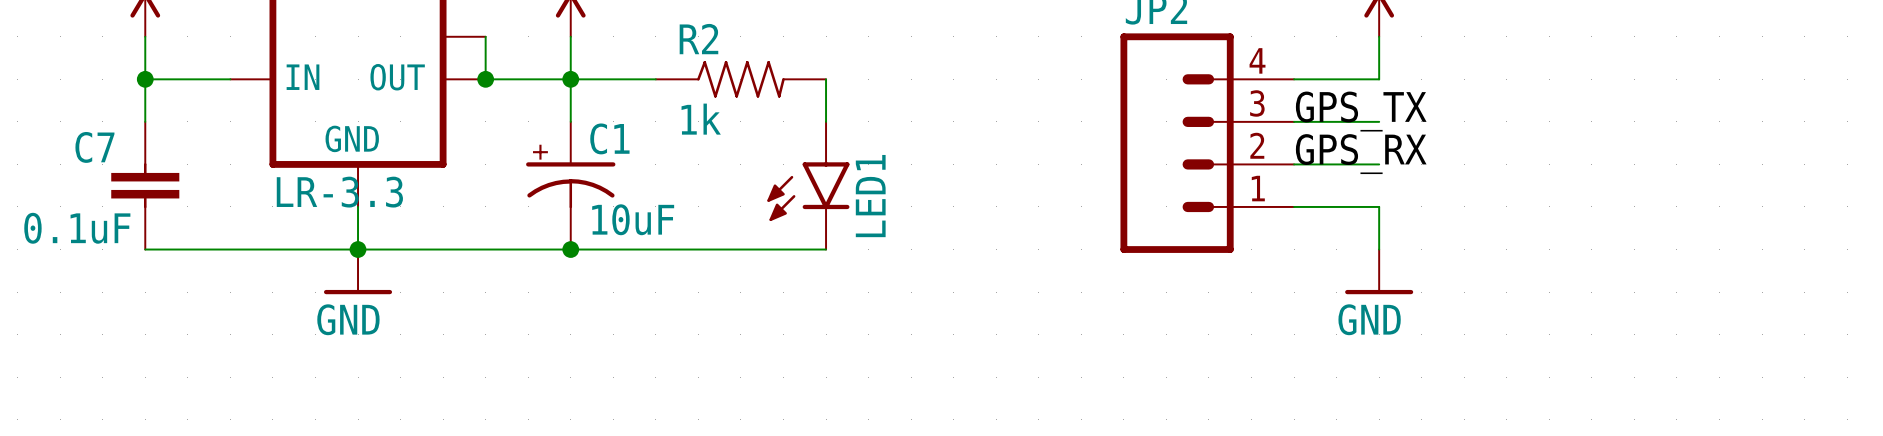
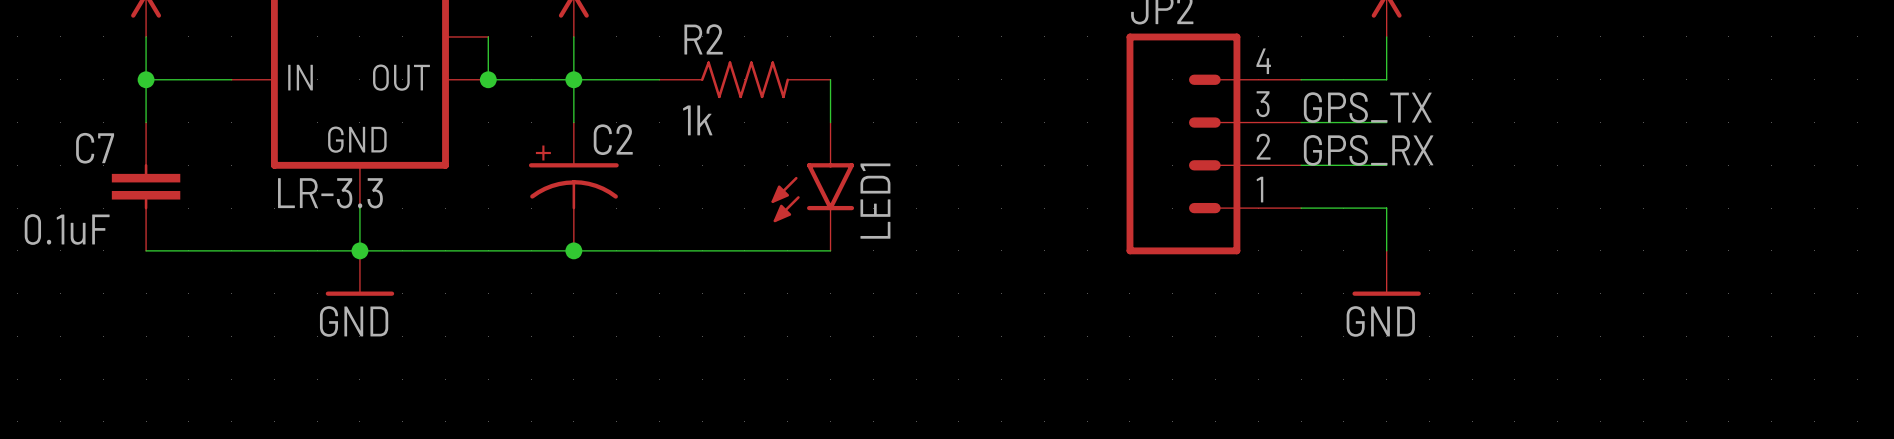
C1 name: C1 (609, 138) -> C2 (613, 139)
C1 value: 10uF (633, 219) -> none

